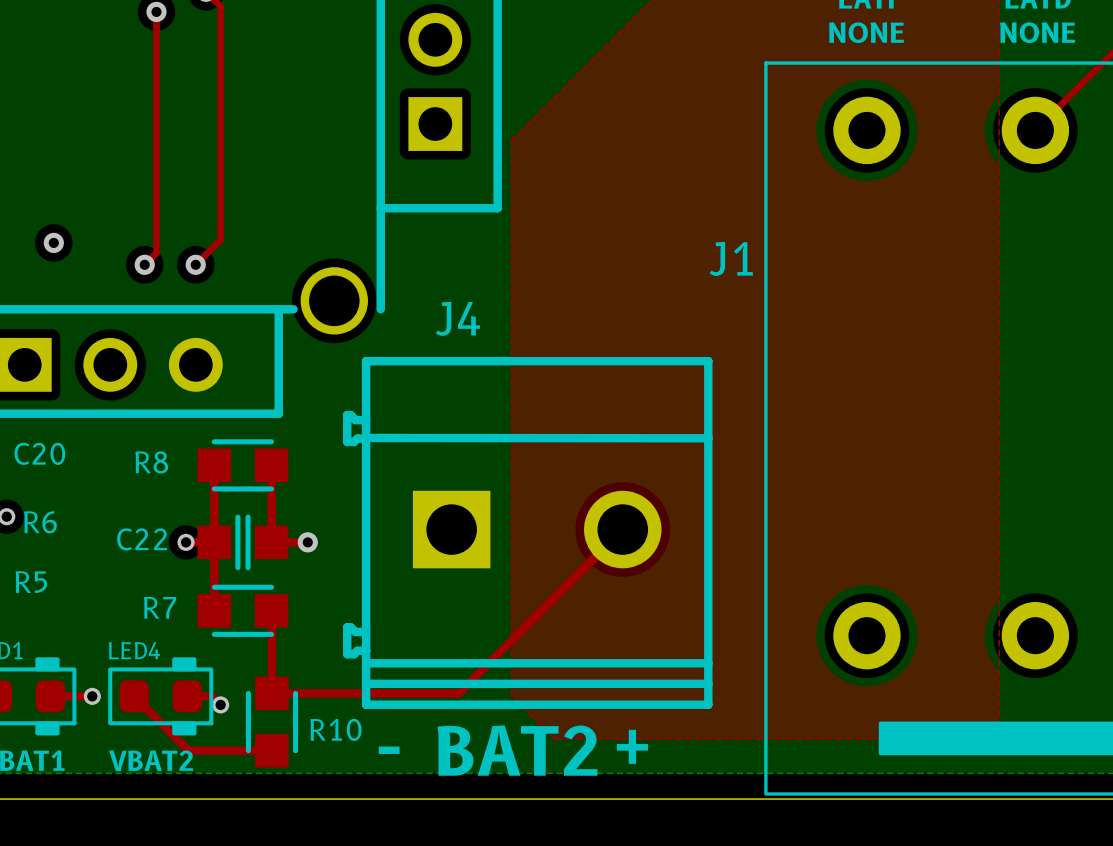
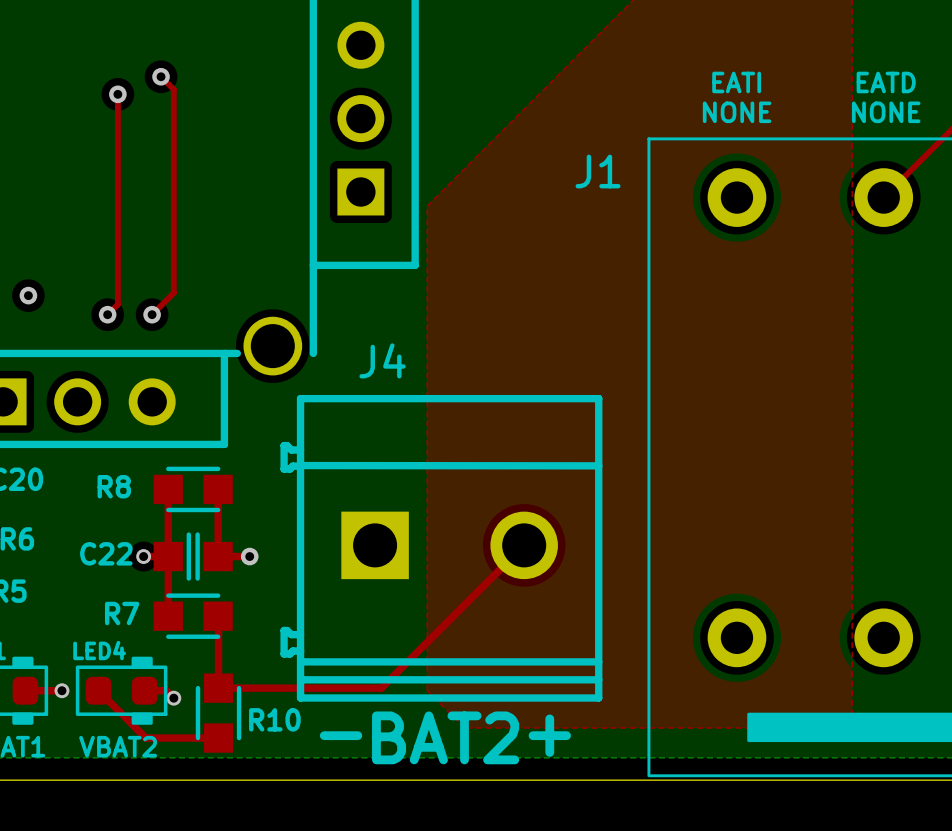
J1 name position: J1 (731, 258) -> J1 (598, 171)

